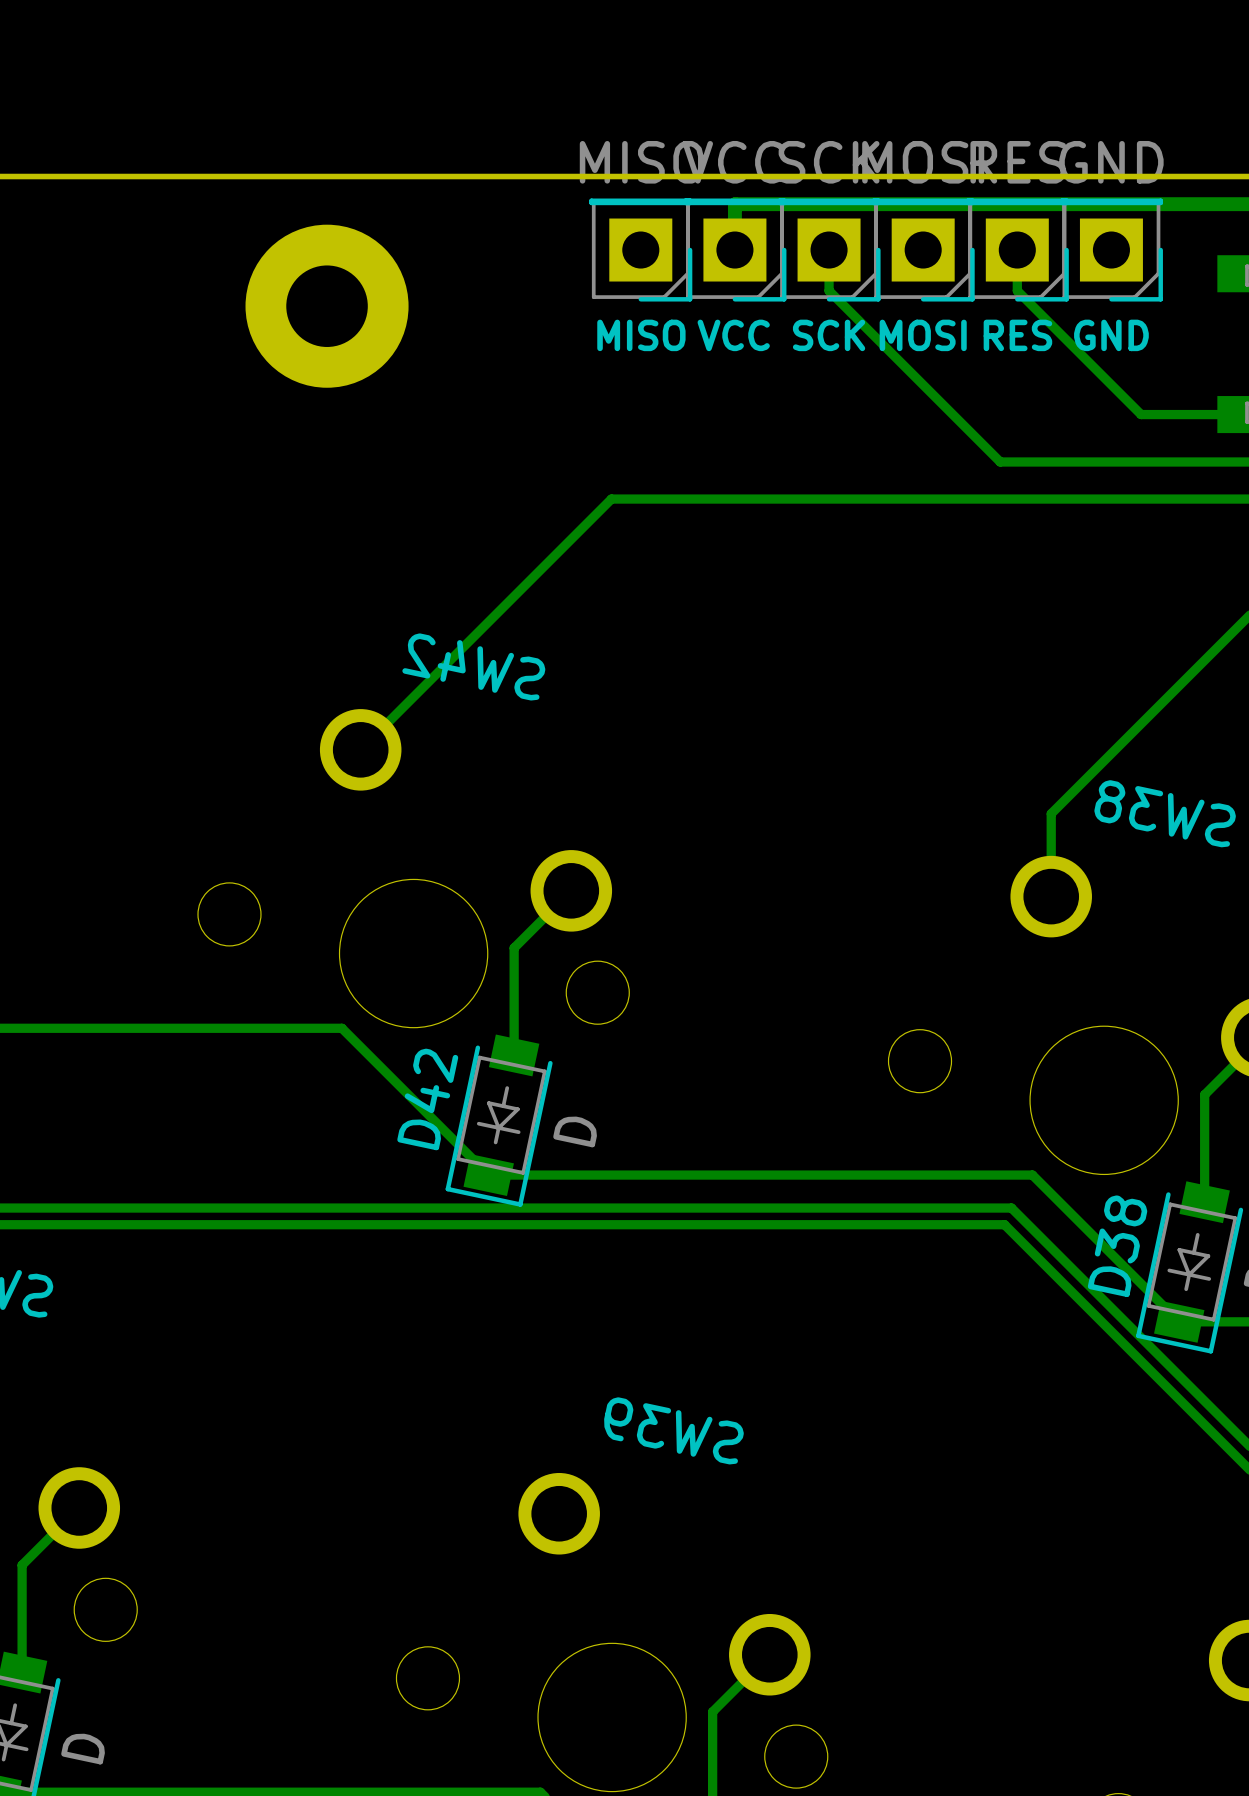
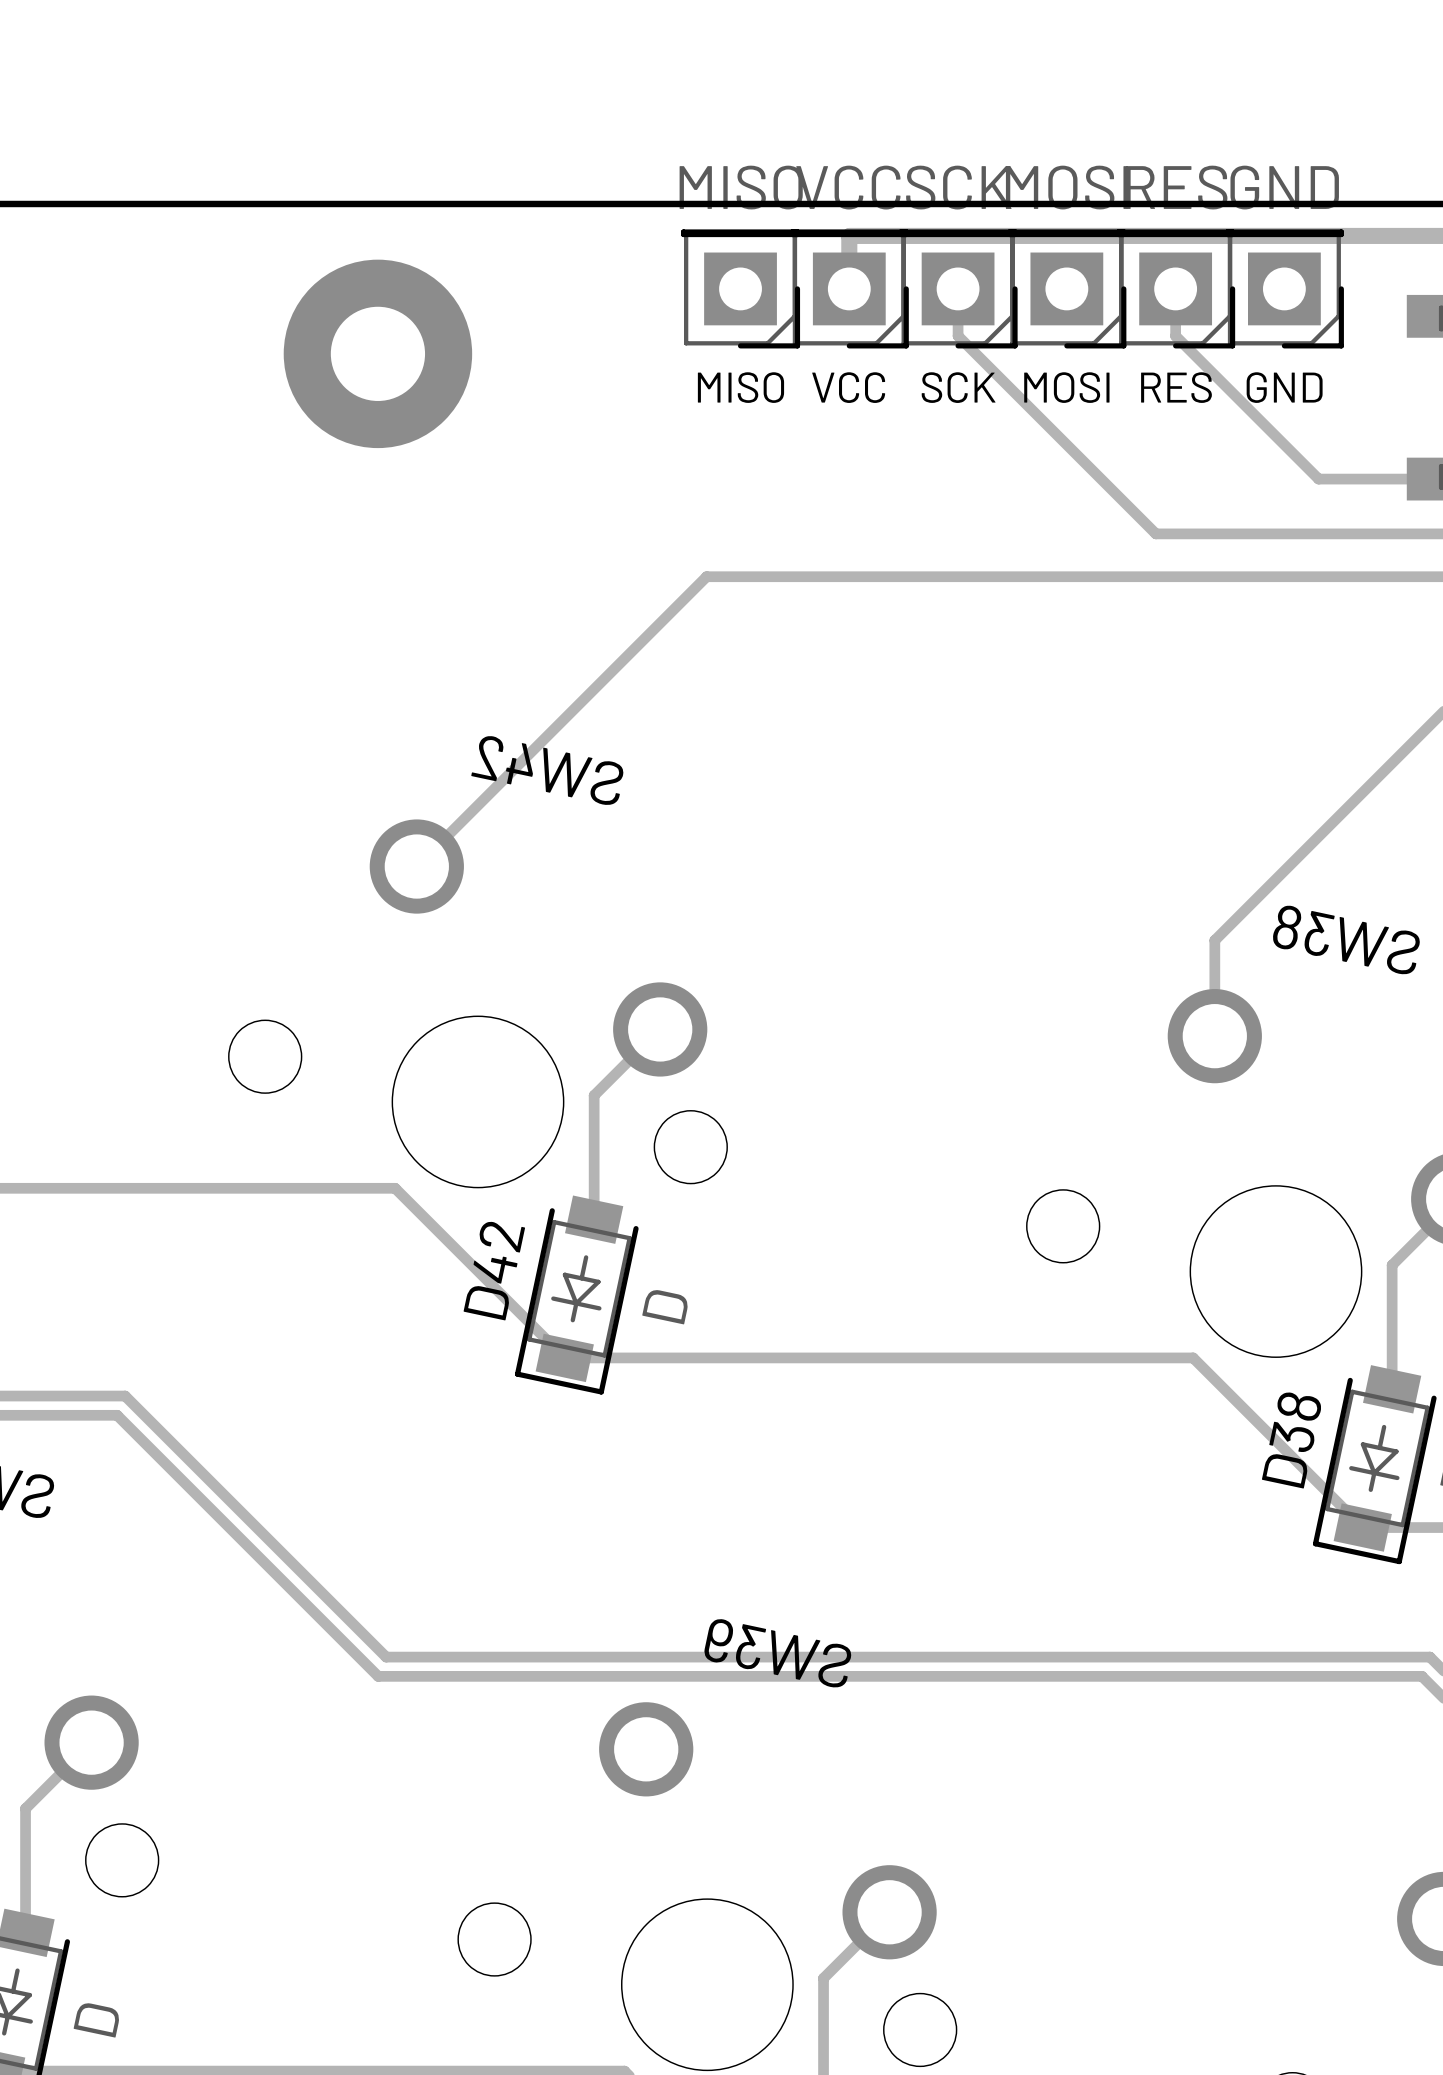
track: (108, 1208) (1011, 1208) (1237, 1433) -> (125, 1396) (386, 1657) (1429, 1657)
track: (101, 1224) (1004, 1224) (1230, 1450) -> (117, 1415) (378, 1676) (1421, 1676)

